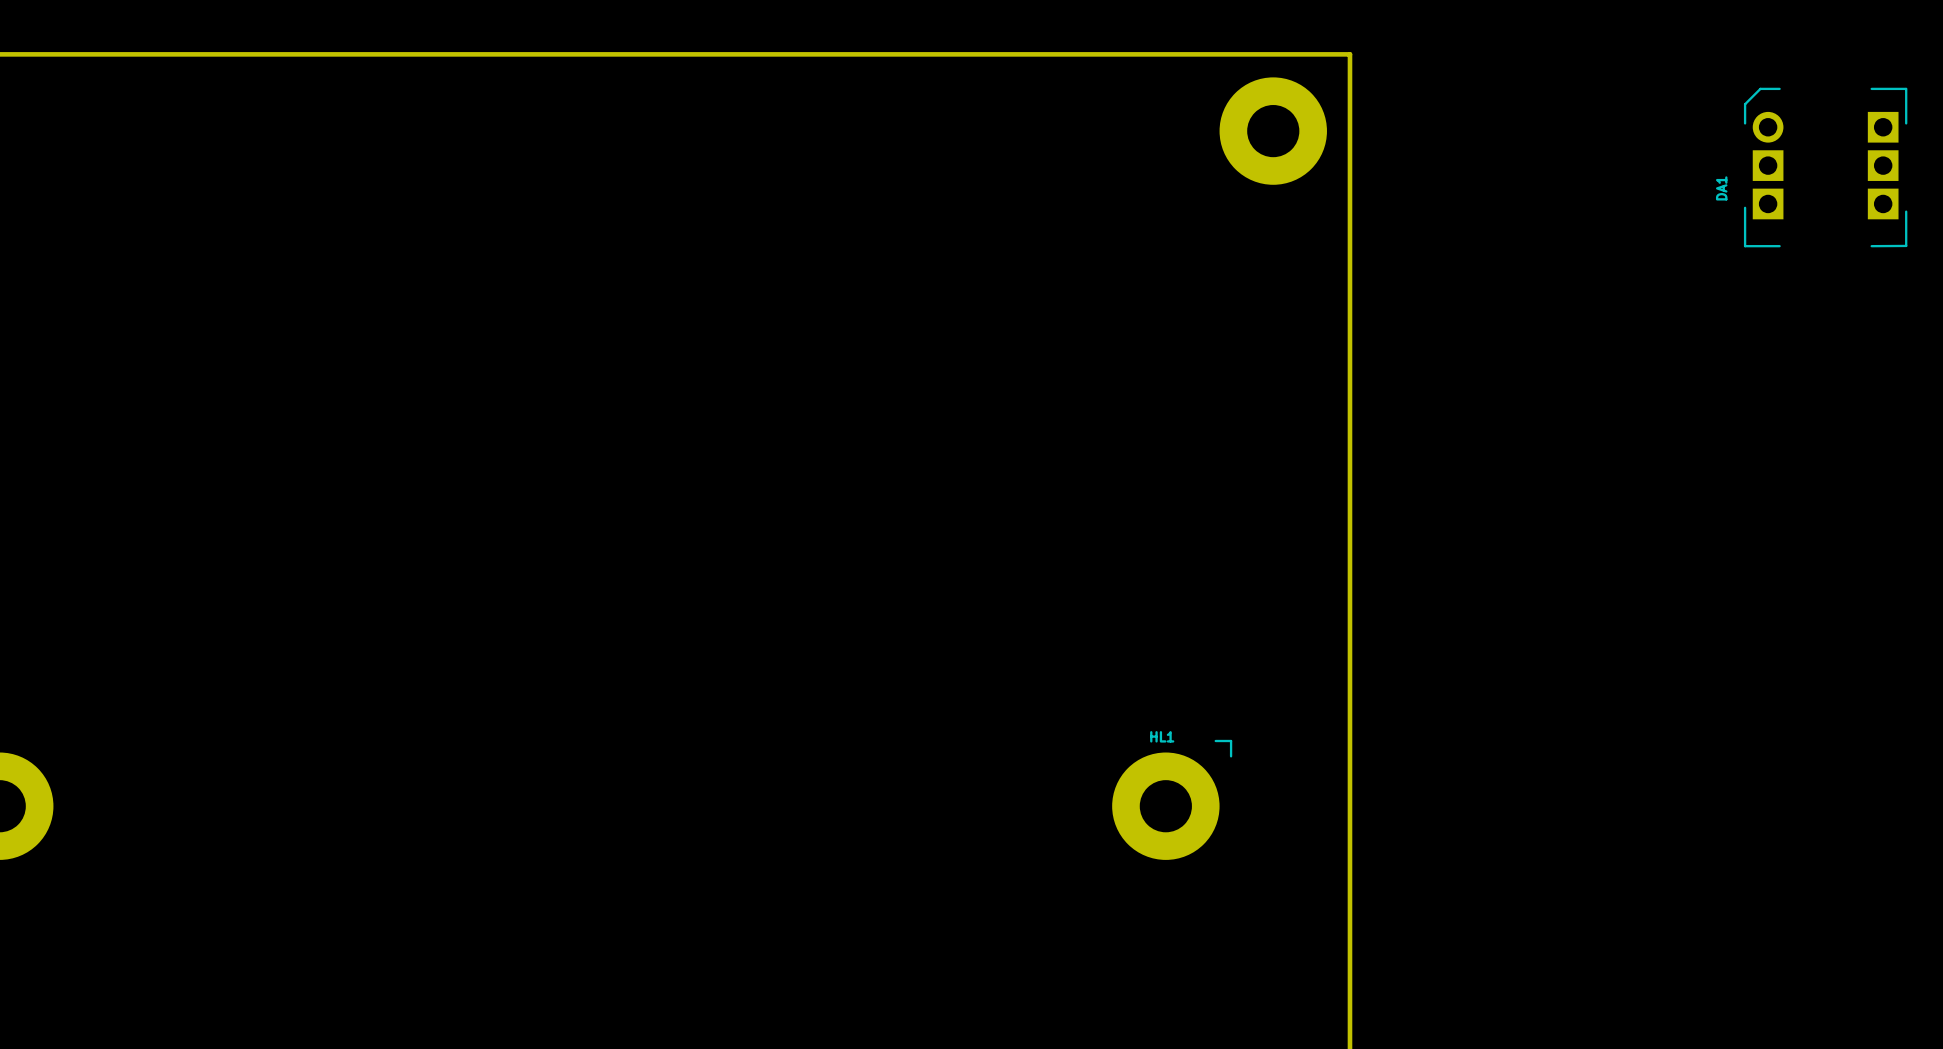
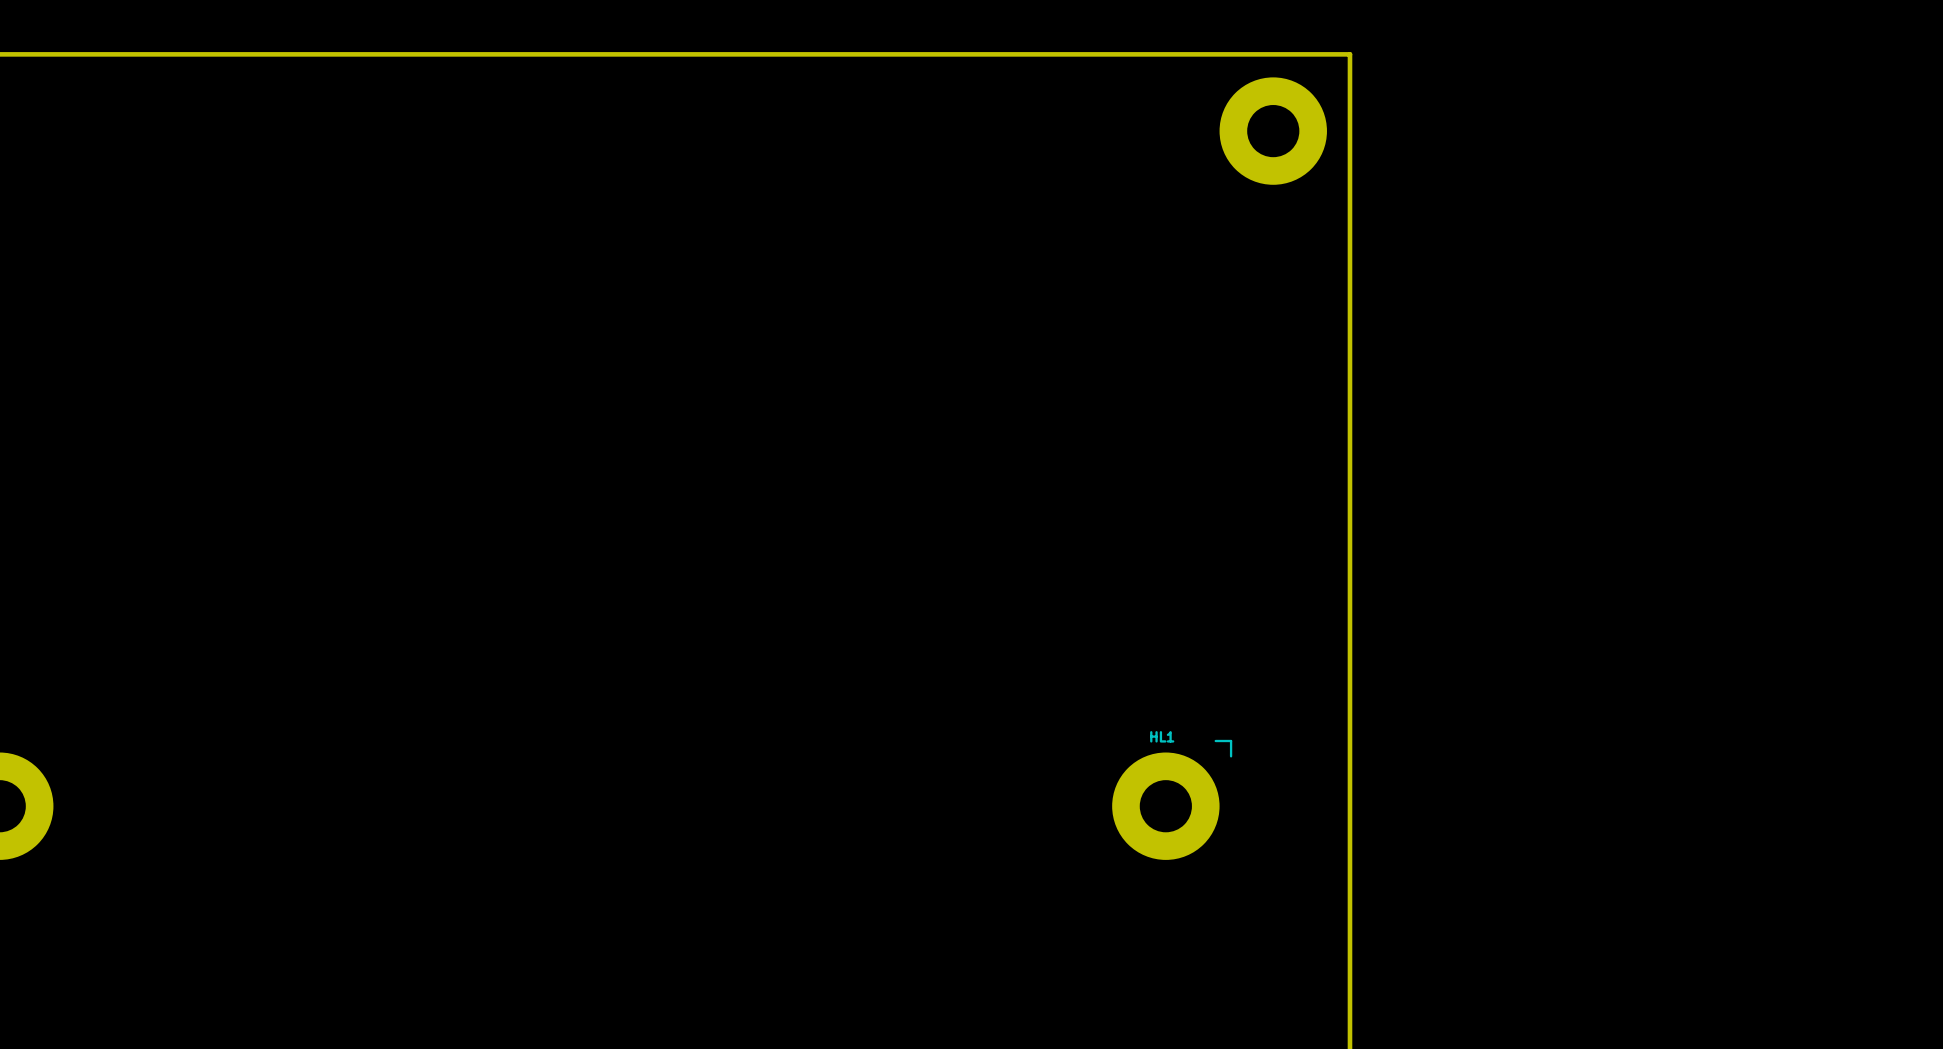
DA1: (1825, 167) -> none

